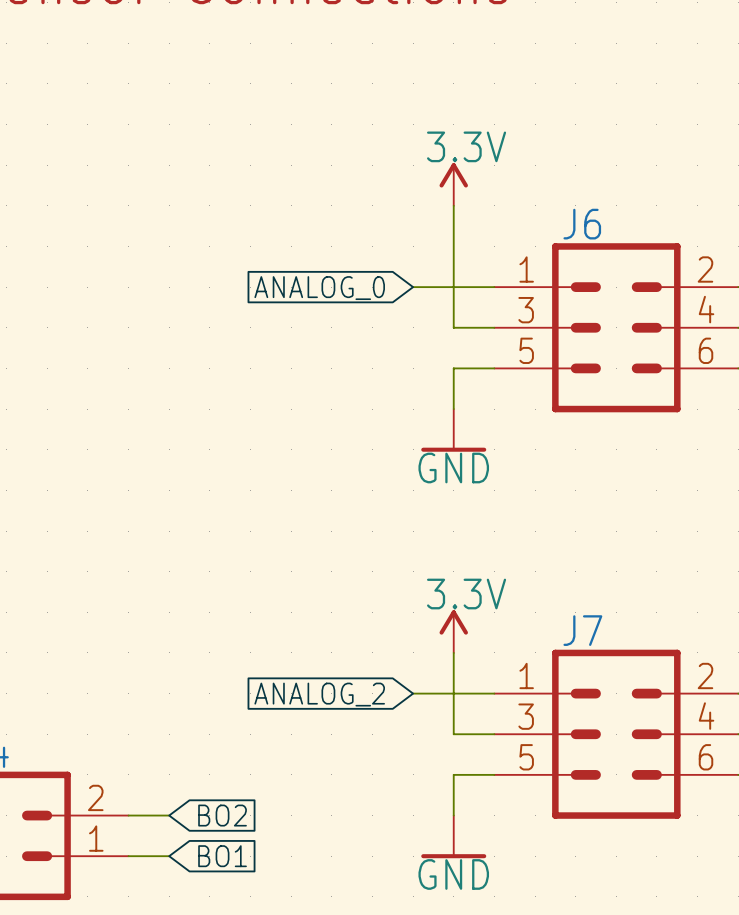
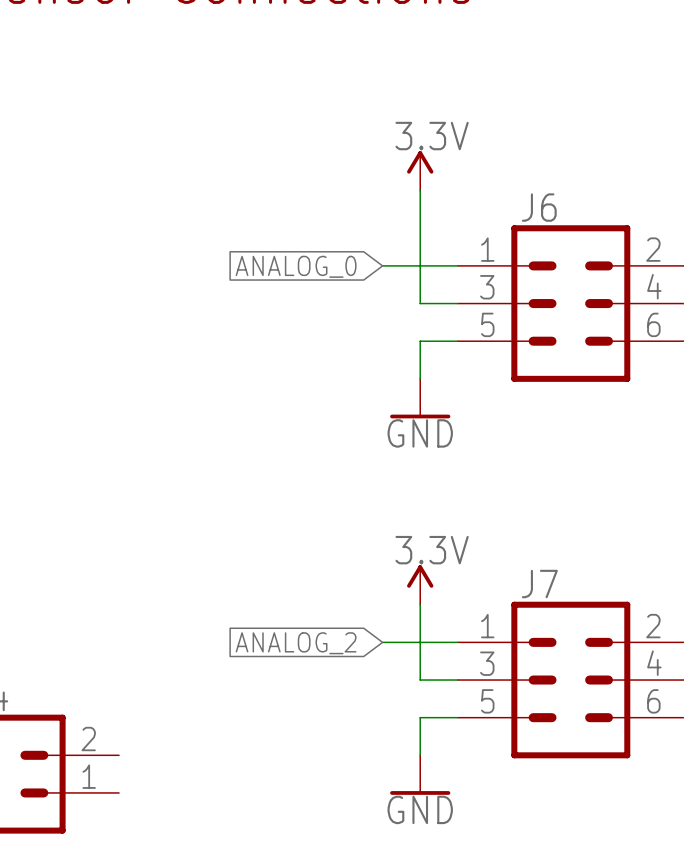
wire: (128, 815) (169, 815) -> none
global label: BO2 (222, 815) -> none
wire: (128, 856) (169, 856) -> none
global label: BO1 (222, 856) -> none

